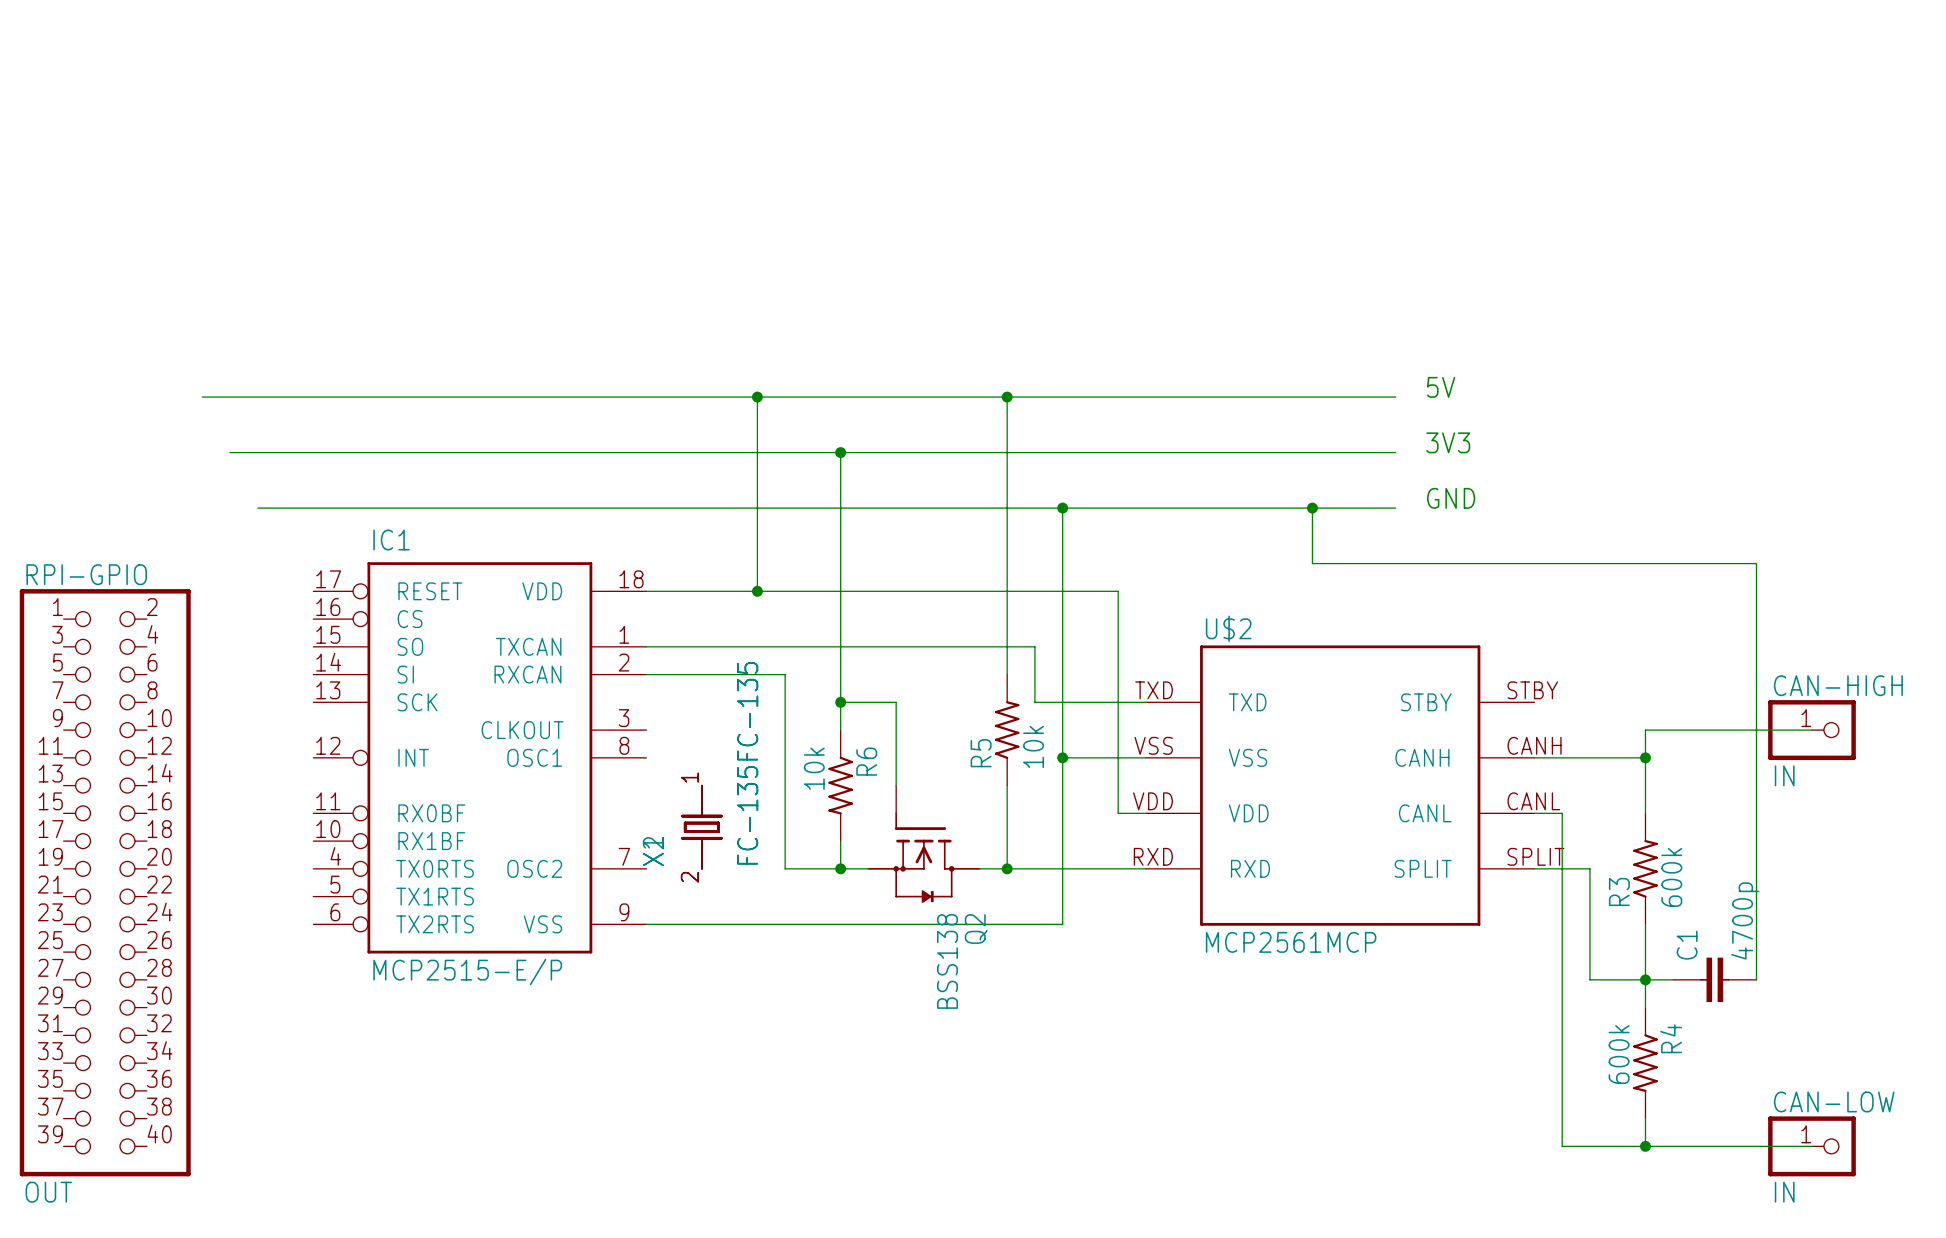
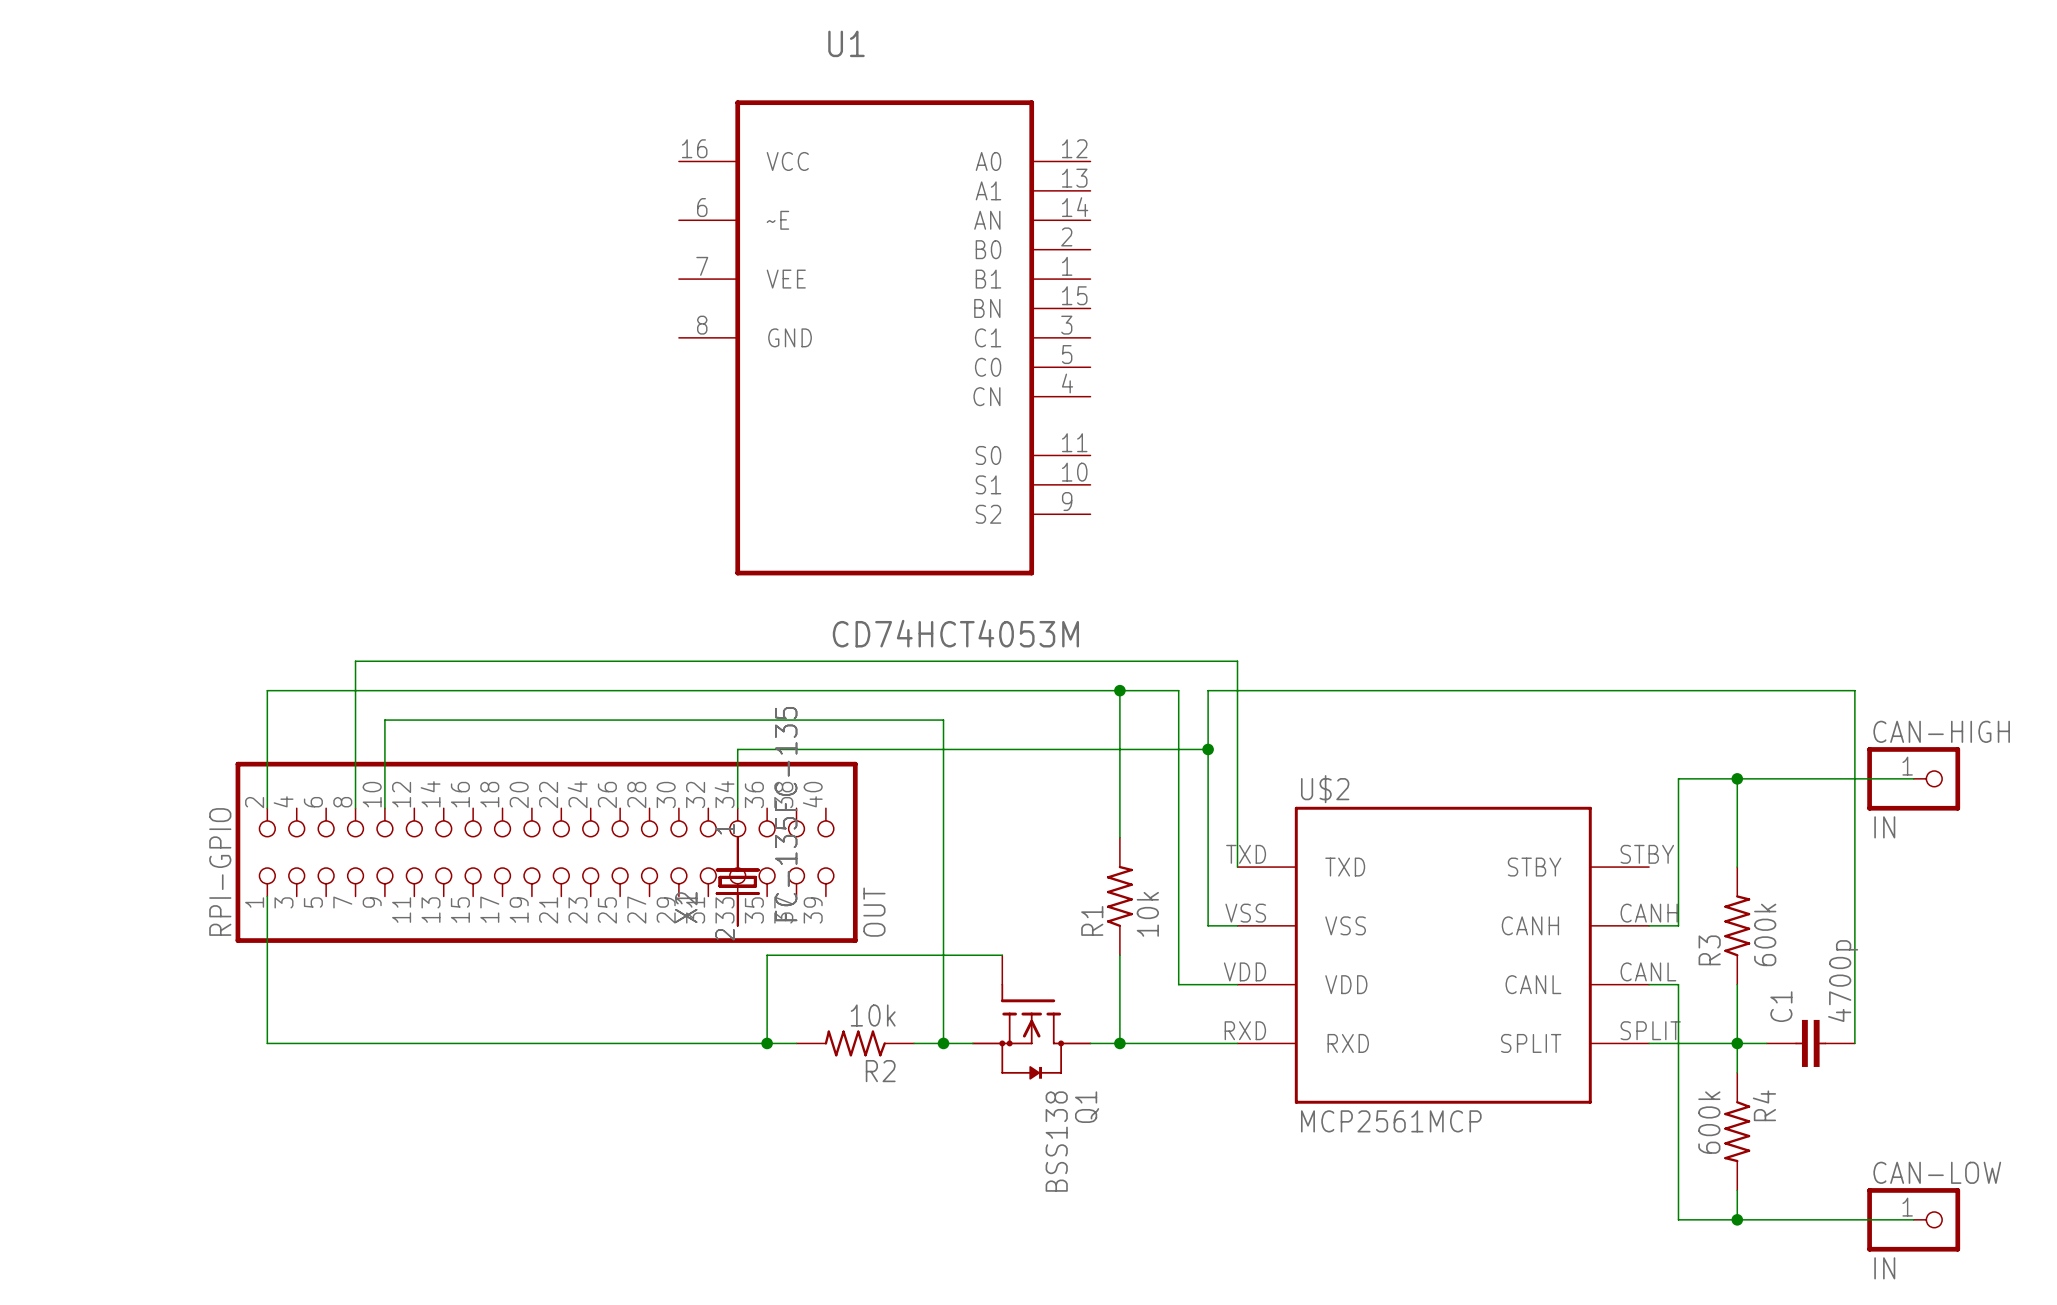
U1: none -> CD74HCT4053M (884, 337)
text: 5V (1441, 387) -> none
wire: (202, 397) (1395, 397) -> none
wire: (757, 397) (757, 591) -> none
junction: (757, 397) -> none
wire: (1007, 397) (1007, 674) -> none
junction: (1007, 397) -> none
text: 3V3 (1448, 442) -> none
wire: (230, 452) (1395, 452) -> none
wire: (840, 452) (840, 730) -> none
junction: (840, 452) -> none
text: GND (1451, 498) -> none
wire: (257, 508) (1395, 508) -> none
wire: (1062, 508) (1062, 646) -> none
junction: (1062, 508) -> none
wire: (1312, 508) (1312, 563) (1756, 563) (1756, 646) -> (1237, 925) (1208, 925) (1208, 690) (1854, 690)
junction: (1312, 508) -> none
wire: (646, 591) (1118, 591) (1118, 646) -> none
junction: (757, 591) -> none
wire: none -> (678, 690) (267, 690) (267, 808)
wire: (1034, 646) (1034, 702) -> (1090, 690) (1178, 690)
junction: none -> (1119, 690)
wire: none -> (678, 720) (384, 720) (384, 808)
wire: (785, 674) (785, 868) (868, 868) -> (825, 720) (943, 720) (943, 749) (1090, 749)
wire: none -> (884, 749) (737, 749) (737, 808)
junction: (840, 702) -> none
junction: none -> (1208, 749)
R5: 10k (1007, 730) -> none
wire: none -> (1737, 778) (1678, 778) (1678, 925)
wire: none -> (355, 808) (355, 661) (1237, 661) (1237, 867)
IC1: MCP2515-E/P (479, 757) -> none
wire: (1062, 757) (1145, 757) -> none
junction: (1062, 757) -> none
wire: (1534, 757) (1645, 757) -> none
junction position: (1645, 757) -> (1737, 778)
R6: 10k (840, 785) -> none
wire: none -> (943, 837) (943, 1043)
wire: (1007, 785) (1007, 868) -> none
U$2 position: (1340, 785) -> (1443, 955)
RPI-GPIO: none -> OUT (546, 852)
wire: (1118, 813) (1145, 813) -> (1178, 867) (1178, 984) (1237, 984)
wire: (1534, 813) (1562, 813) (1562, 1146) (1589, 1146) -> (1649, 1043) (1678, 1043) (1678, 1219)
wire: none -> (267, 896) (267, 1043) (796, 1043)
wire: (840, 841) (840, 868) -> none
R1: none -> 10k (1119, 896)
Q2: BSS138 (923, 844) -> none
junction: (840, 868) -> none
wire: (979, 868) (1145, 868) -> none
junction: (1007, 868) -> none
wire: (1589, 868) (1589, 924) -> (1649, 984) (1678, 984)
RPI-GPIO: OUT (105, 882) -> none
wire: none -> (1002, 955) (767, 955) (767, 1043)
wire: (646, 924) (1062, 924) -> (1119, 1043) (1119, 984)
Q1: none -> BSS138 (1031, 1017)
junction: none -> (767, 1043)
R2: none -> 10k (855, 1043)
wire: none -> (914, 1043) (972, 1043)
junction: none -> (943, 1043)
wire: none -> (1090, 1043) (1237, 1043)
junction: none -> (1119, 1043)

